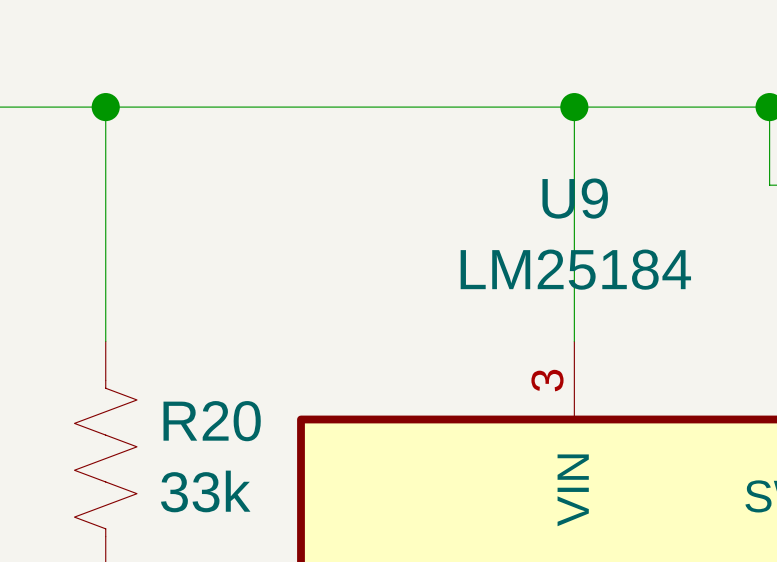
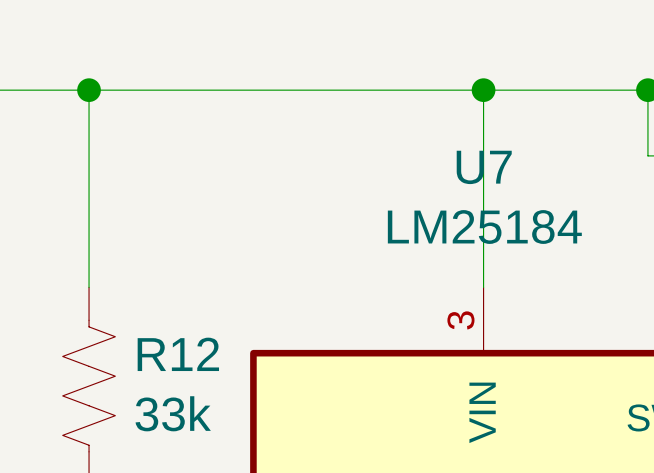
U9 name: U9 (575, 198) -> U7 (484, 167)
R20 name: R20 (212, 421) -> R12 (178, 354)

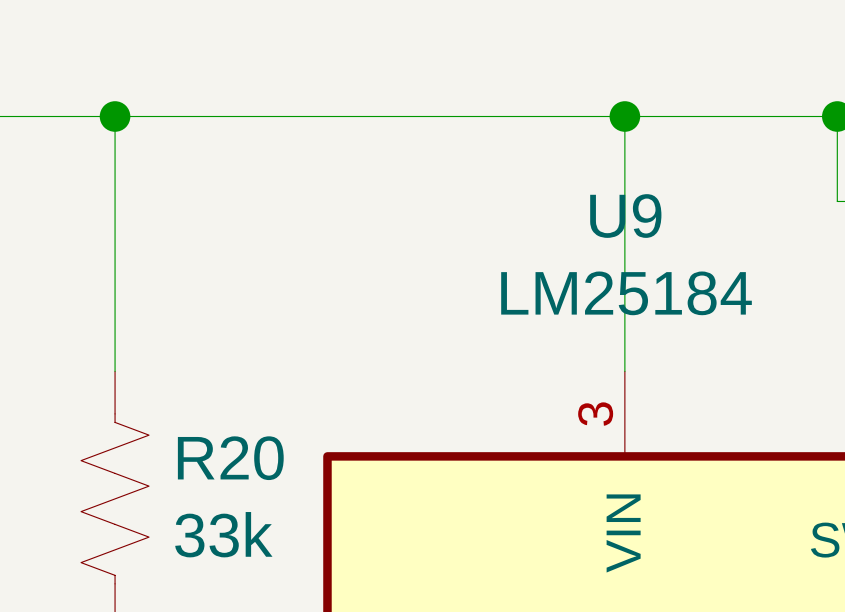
U7 name: U7 (484, 167) -> U9 (625, 216)
R12 name: R12 (178, 354) -> R20 (230, 458)

